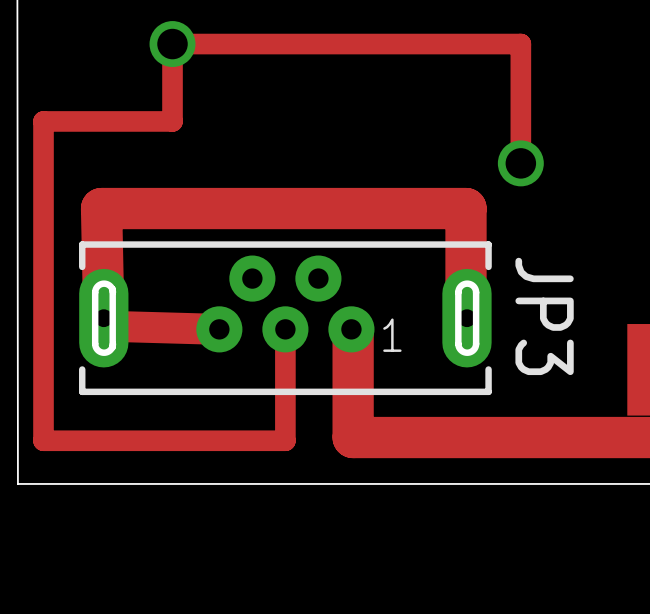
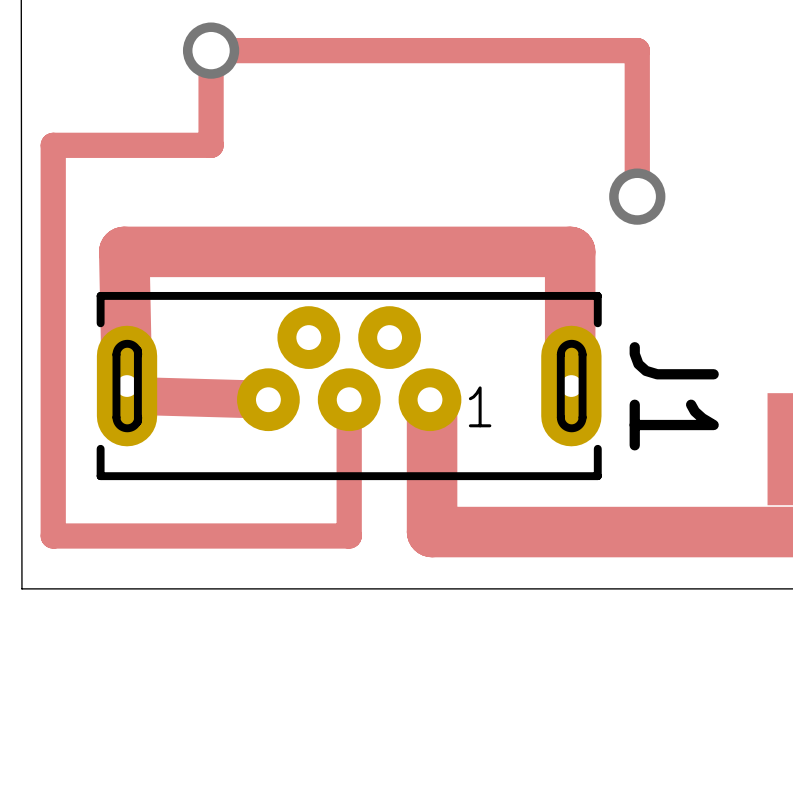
JP3: (285, 318) -> none
J1: none -> (349, 386)

